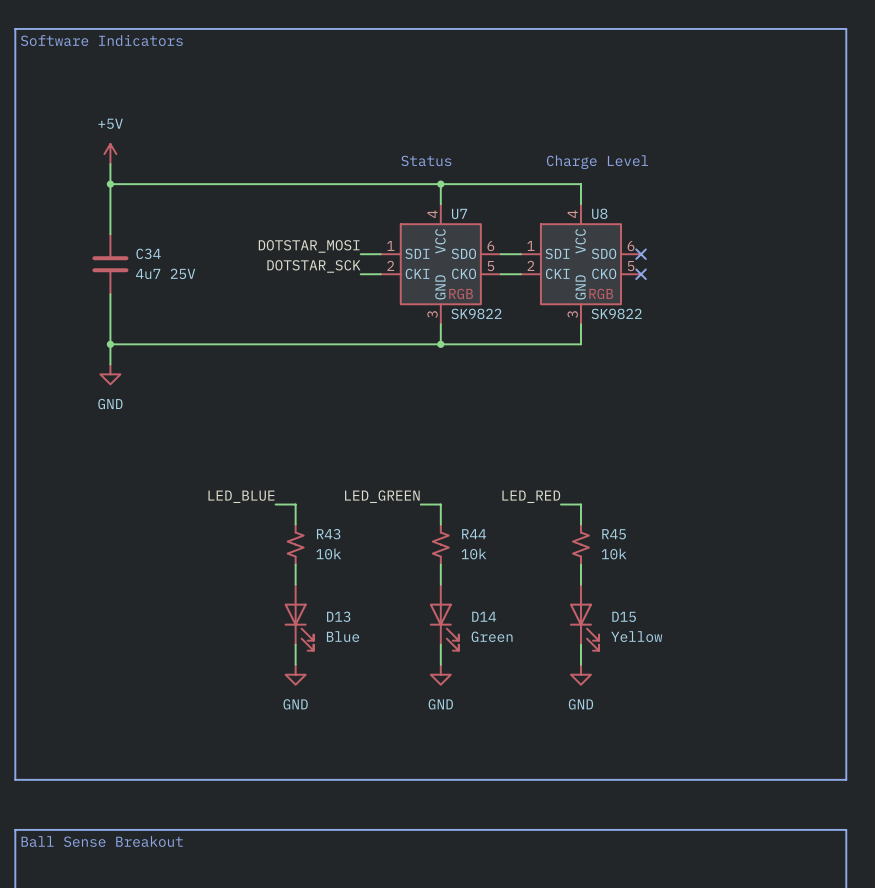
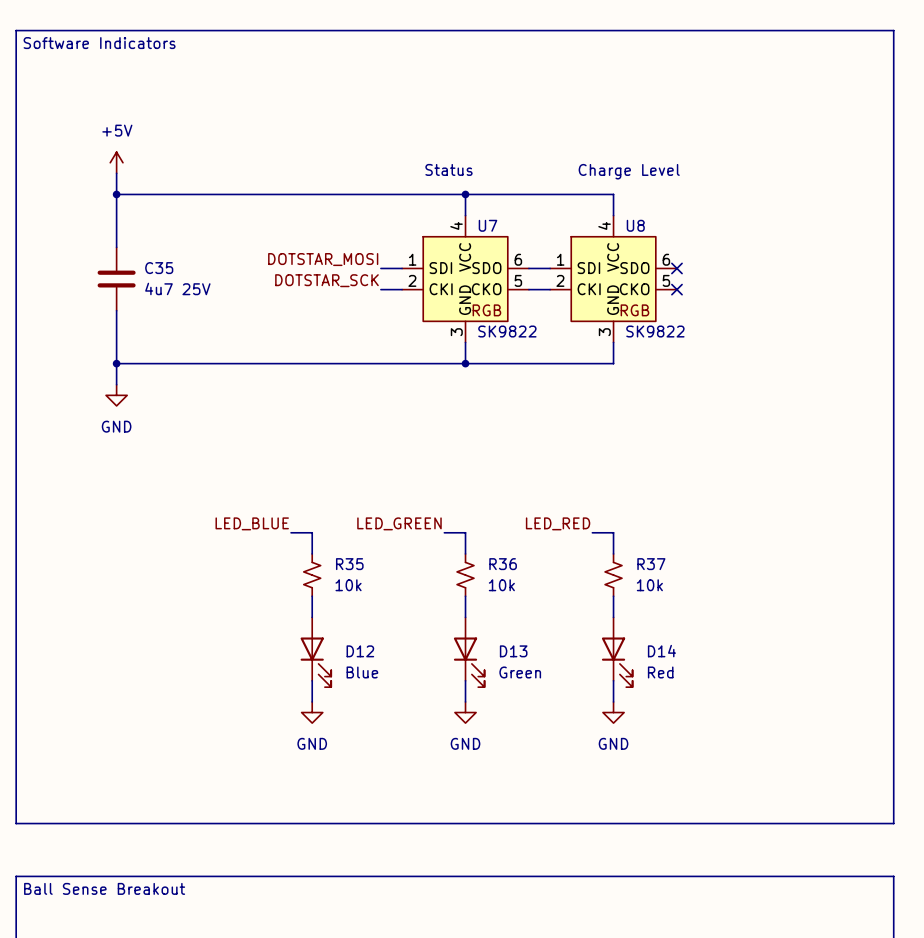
C34 name: C34 (148, 253) -> C35 (159, 268)
R43 name: R43 (328, 534) -> R35 (349, 564)
R44 name: R44 (474, 534) -> R36 (503, 564)
R45 name: R45 (614, 534) -> R37 (651, 564)
D13 name: D13 (338, 616) -> D12 (360, 651)
D14 name: D14 (484, 616) -> D13 (513, 651)
D15 name: D15 (624, 616) -> D14 (661, 651)
D15 value: Yellow (636, 636) -> Red (660, 672)

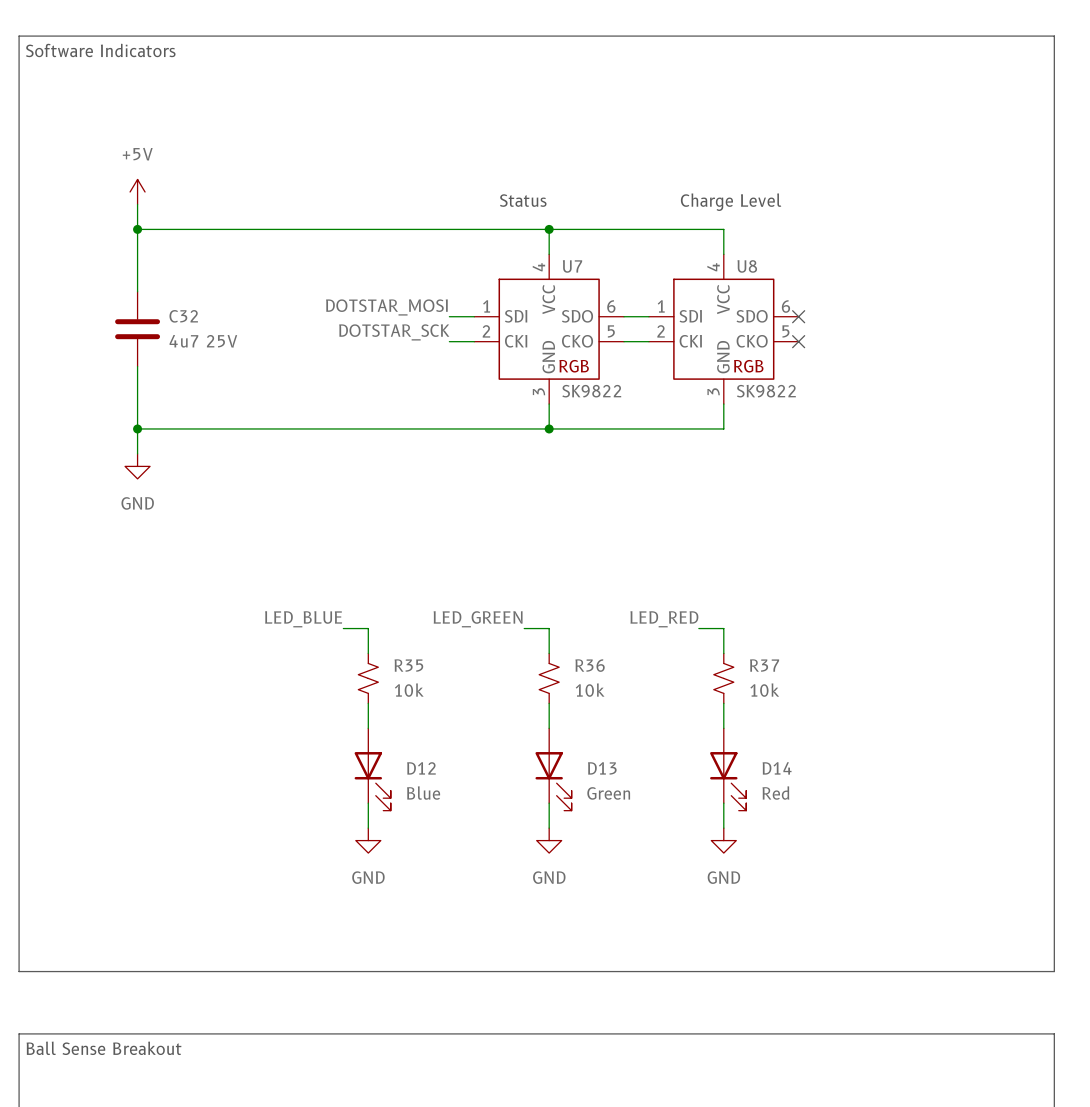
C35 name: C35 (159, 268) -> C32 (183, 316)

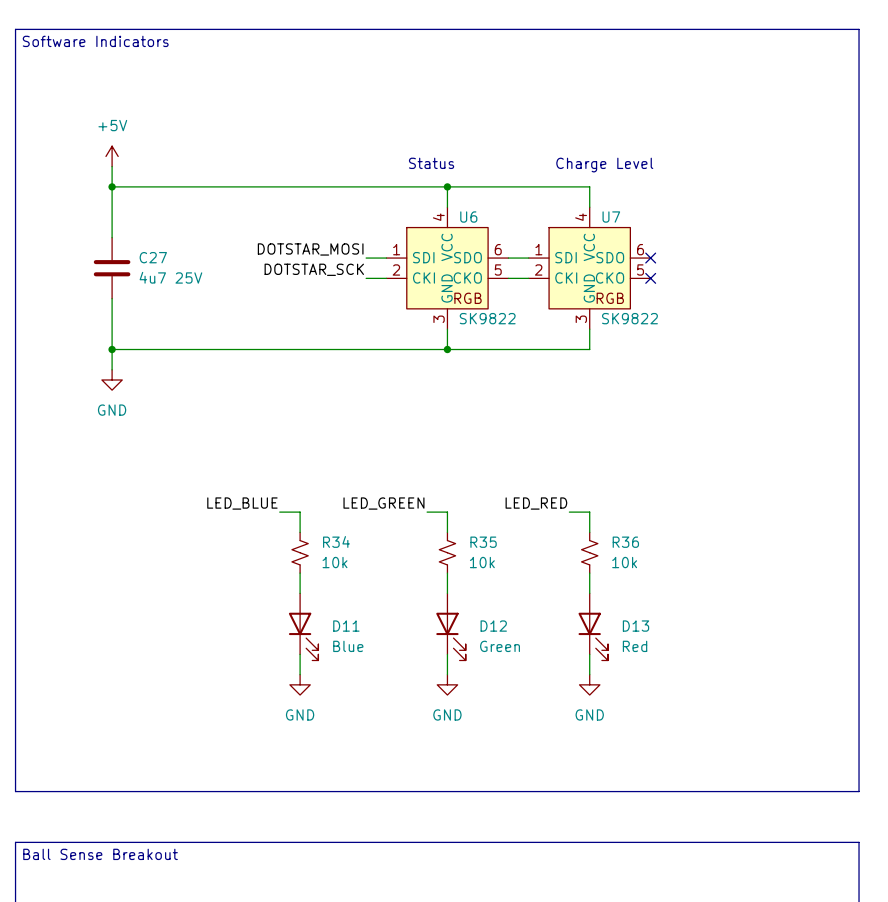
U7 name: U7 (572, 266) -> U6 (468, 217)
U8 name: U8 (747, 266) -> U7 (611, 217)
C32 name: C32 (183, 316) -> C27 (153, 257)
R35 name: R35 (408, 665) -> R34 (336, 541)
R36 name: R36 (590, 665) -> R35 (483, 542)
R37 name: R37 (764, 665) -> R36 (625, 542)
D12 name: D12 (421, 768) -> D11 (346, 626)
D13 name: D13 (602, 768) -> D12 (493, 626)
D14 name: D14 (777, 768) -> D13 (636, 626)

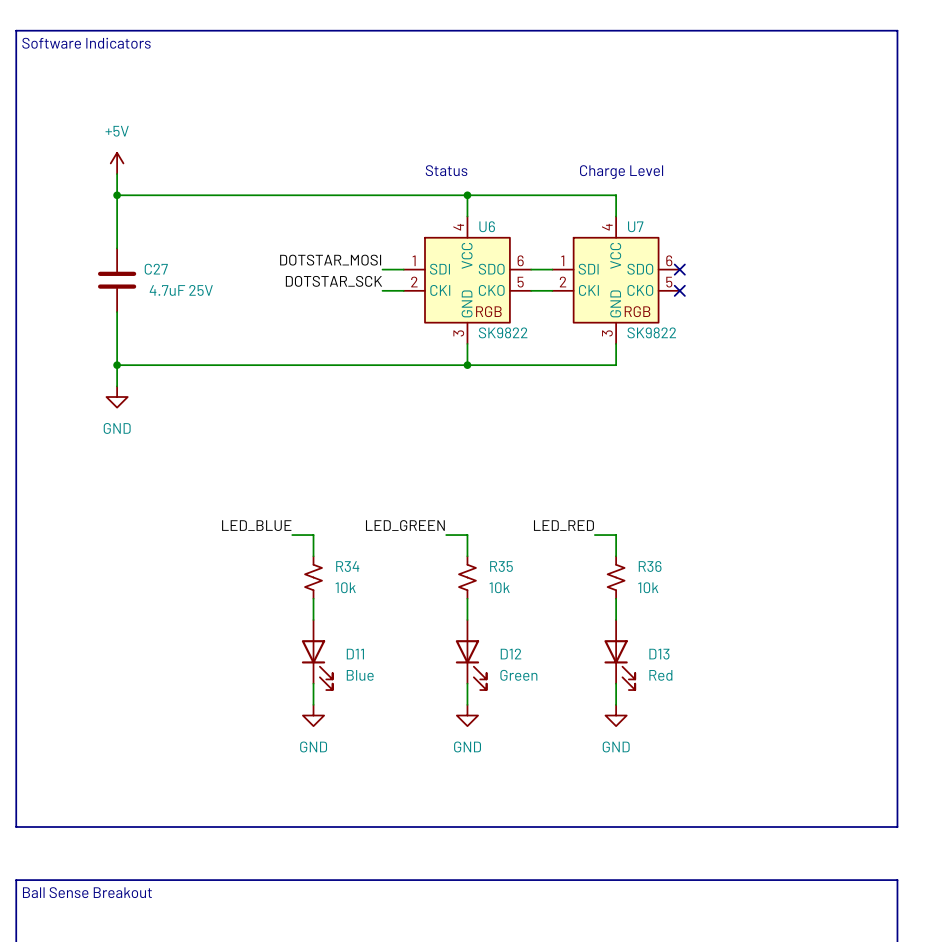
C27 value: 4u7 25V (170, 277) -> 4.7uF 25V (181, 290)

